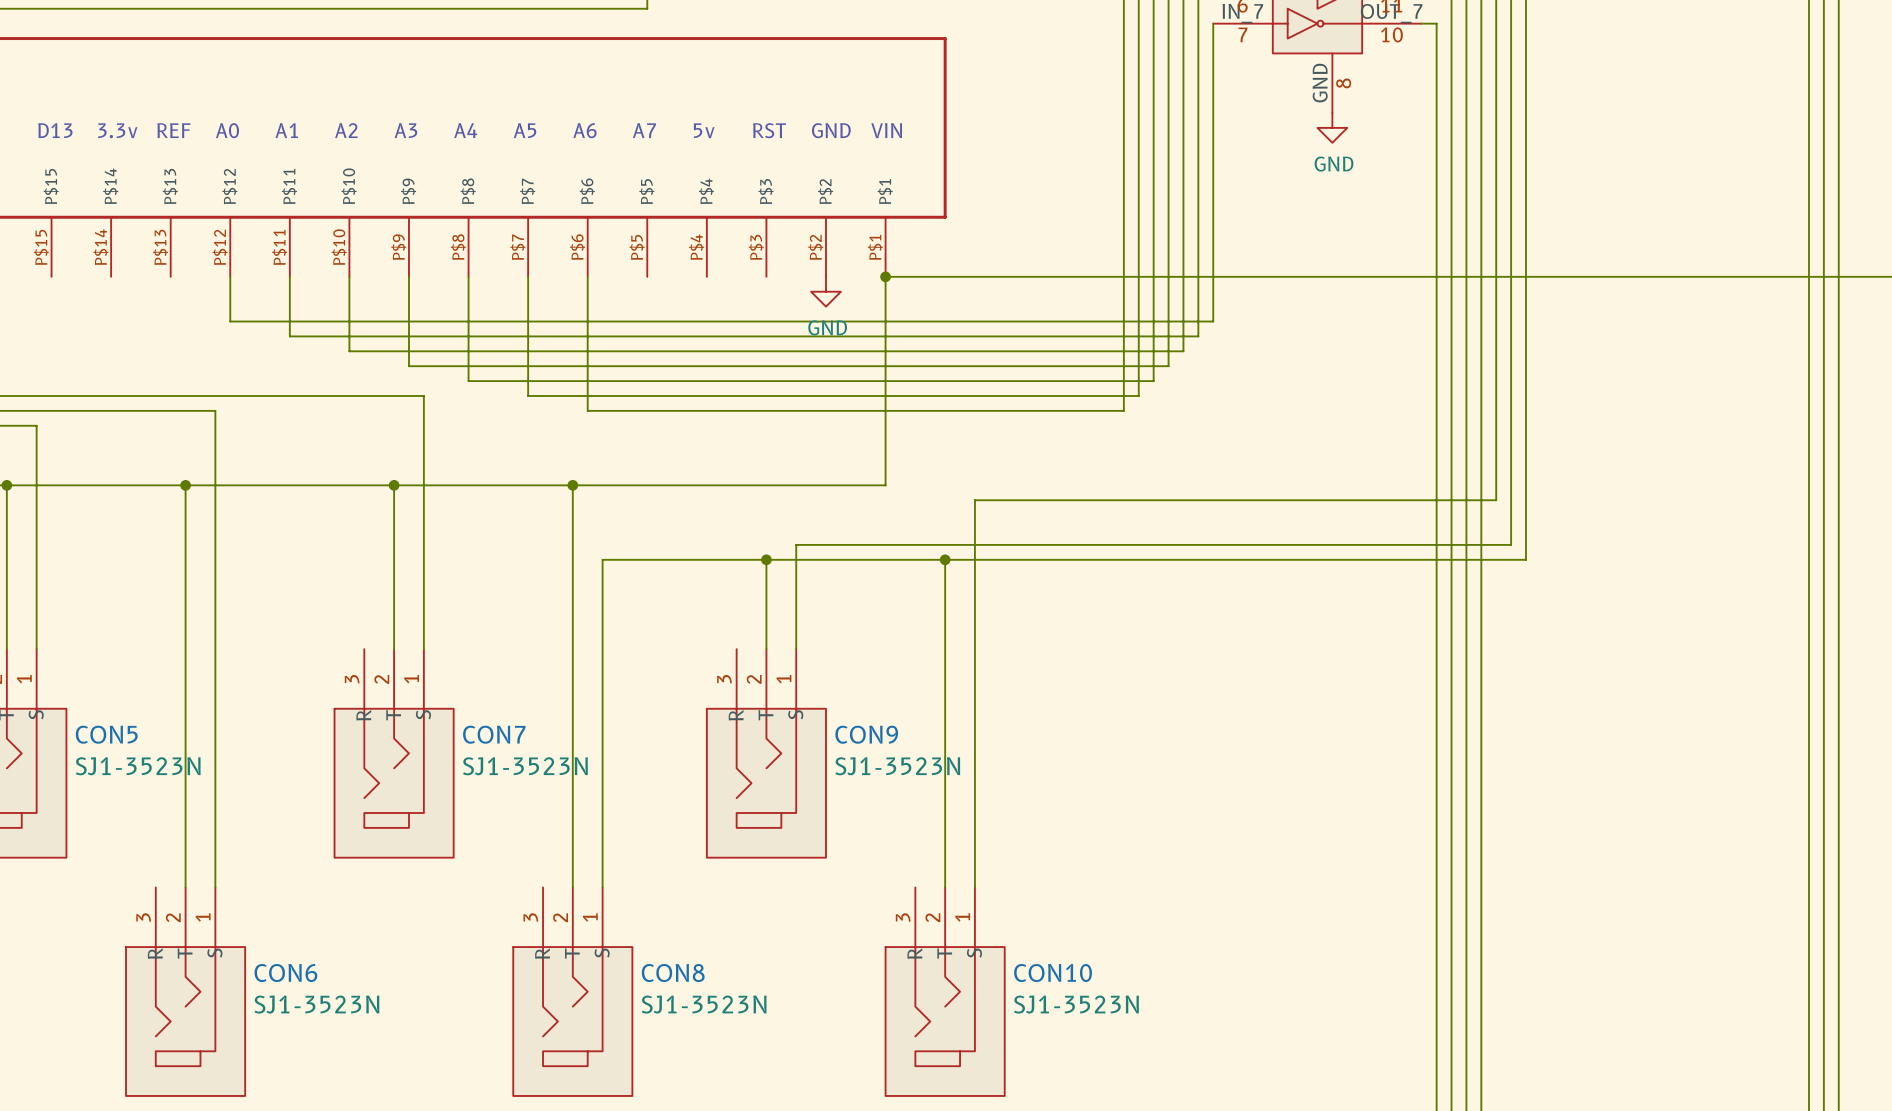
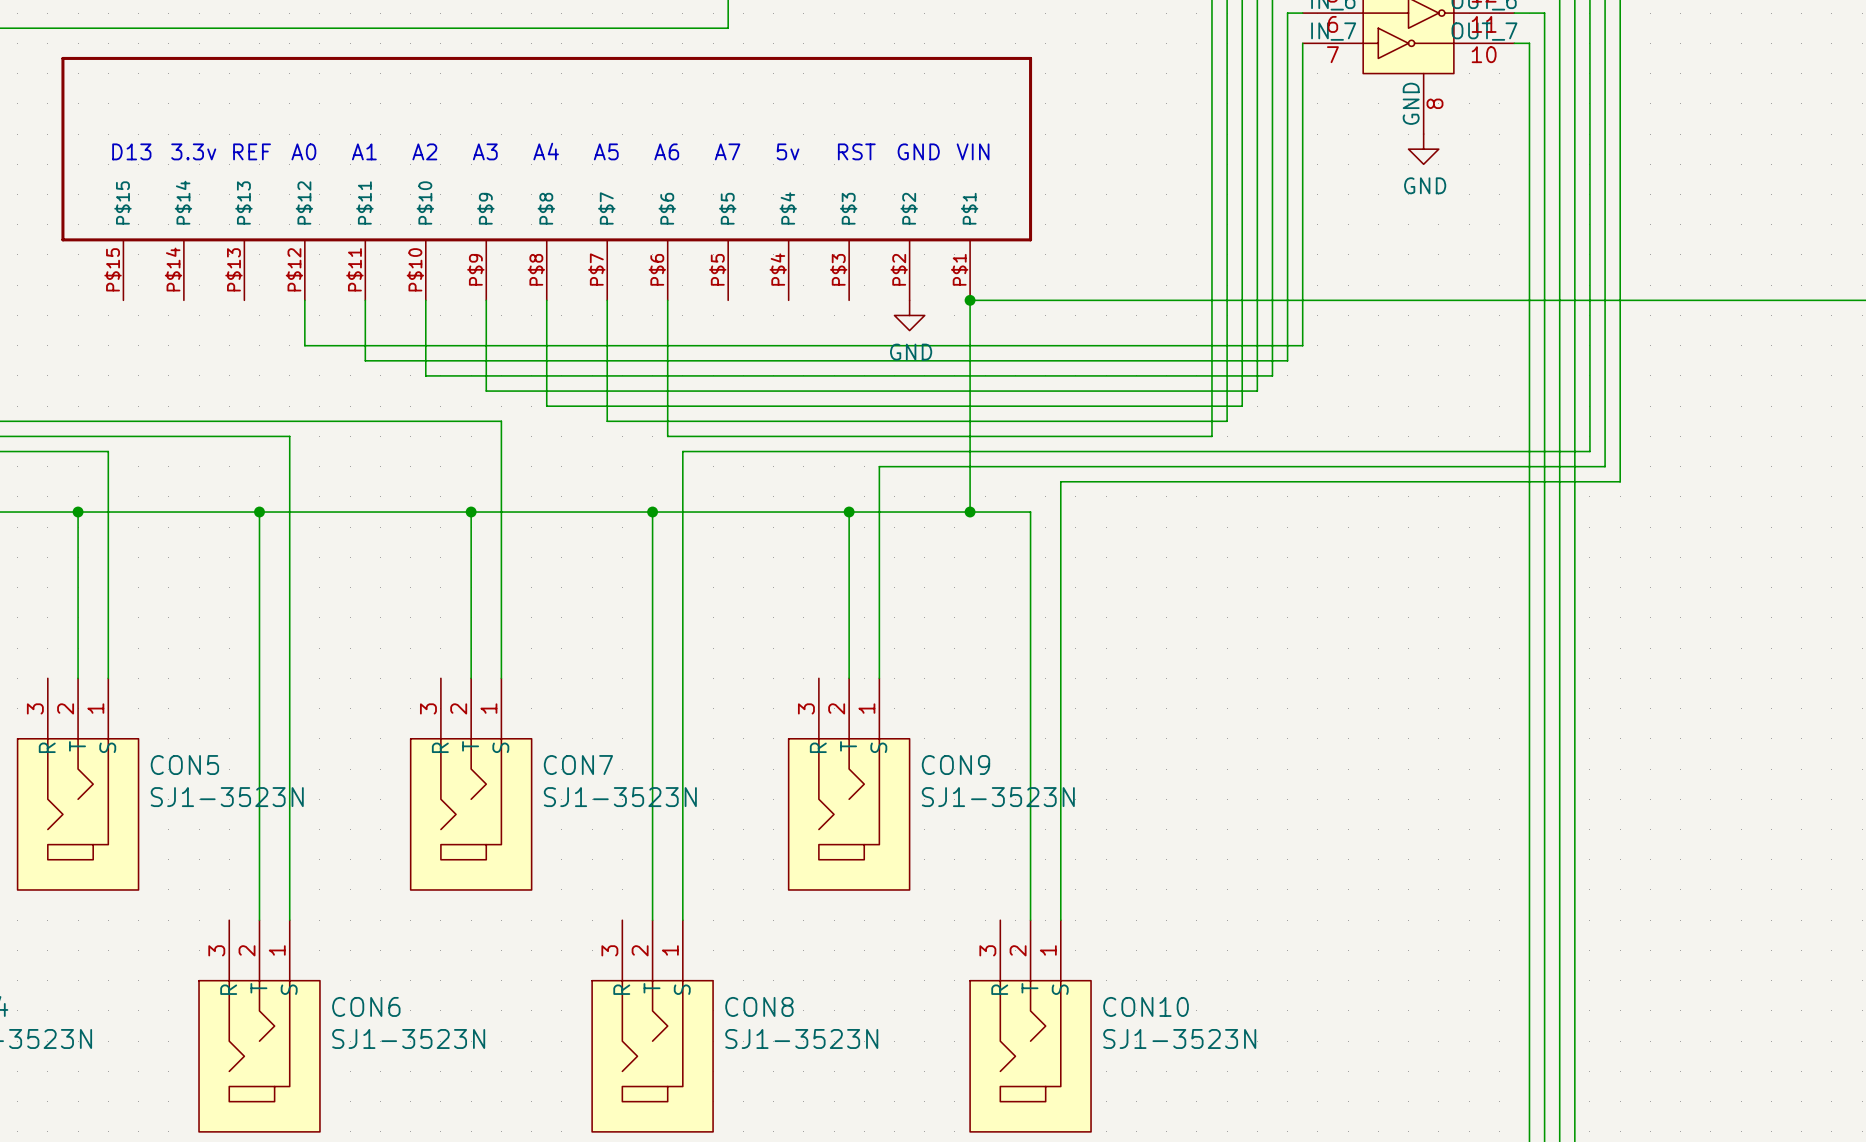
wire: (1496, 425) (1496, 500) (974, 500) -> (1620, 481) (1060, 481) (1060, 527)
wire: (1511, 440) (1511, 544) (796, 544) -> (1605, 466) (879, 466) (879, 572)
wire: (1526, 455) (1526, 559) (602, 559) -> (1589, 451) (682, 451) (682, 587)
wire: none -> (849, 512) (849, 587)
junction: none -> (849, 512)
wire: none -> (970, 512) (1030, 512) (1030, 587)
junction: none -> (970, 512)
junction: (766, 559) -> none
junction: (945, 559) -> none

